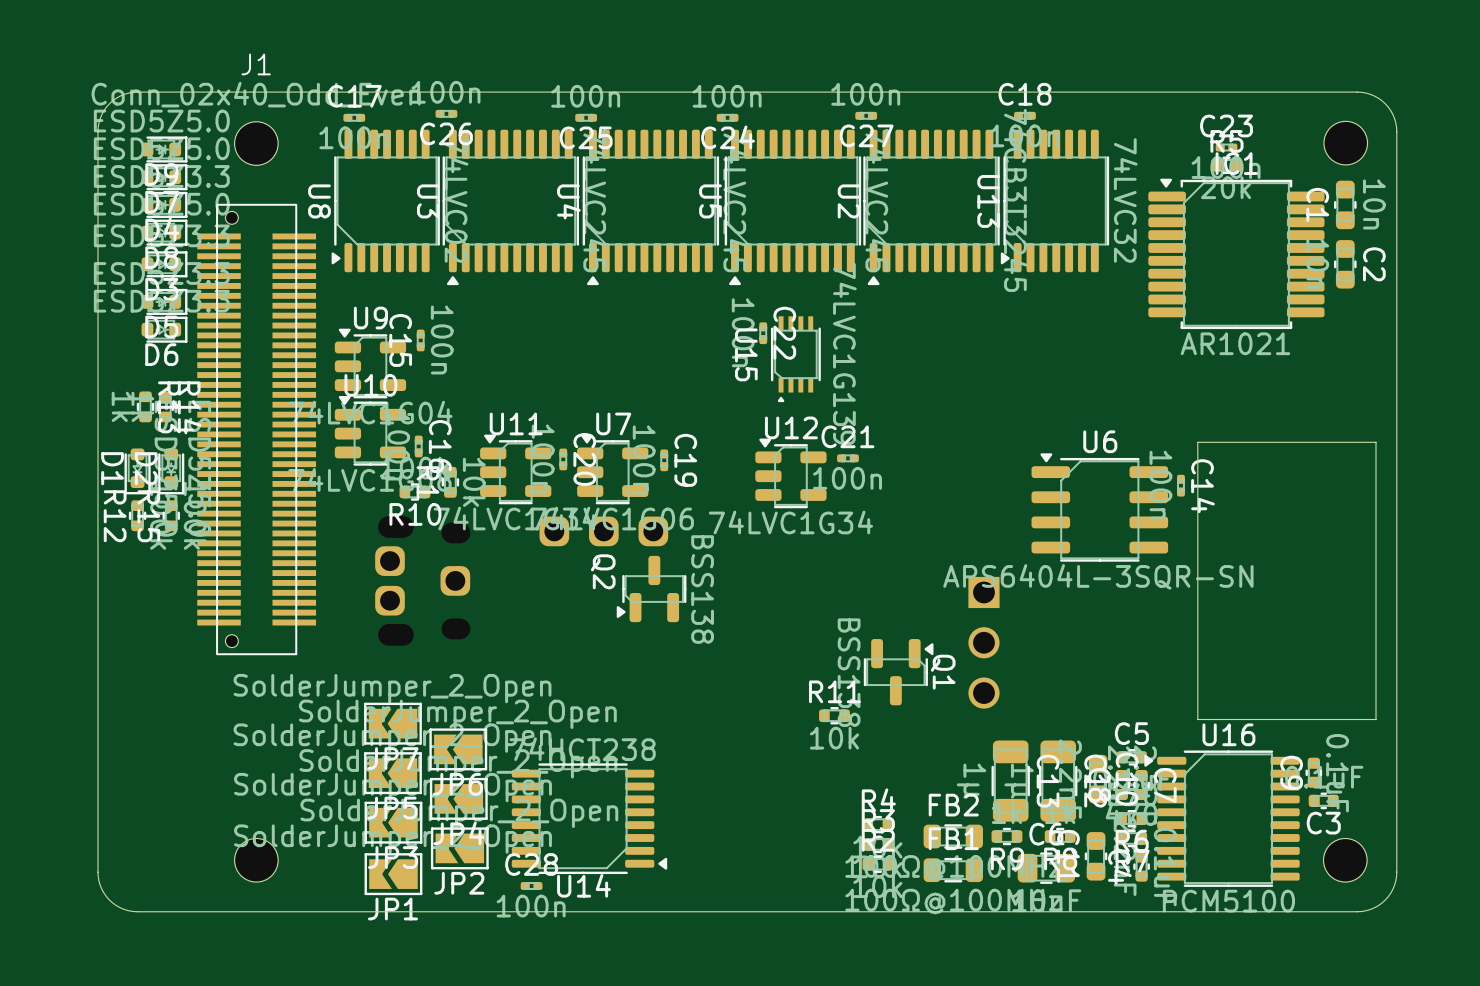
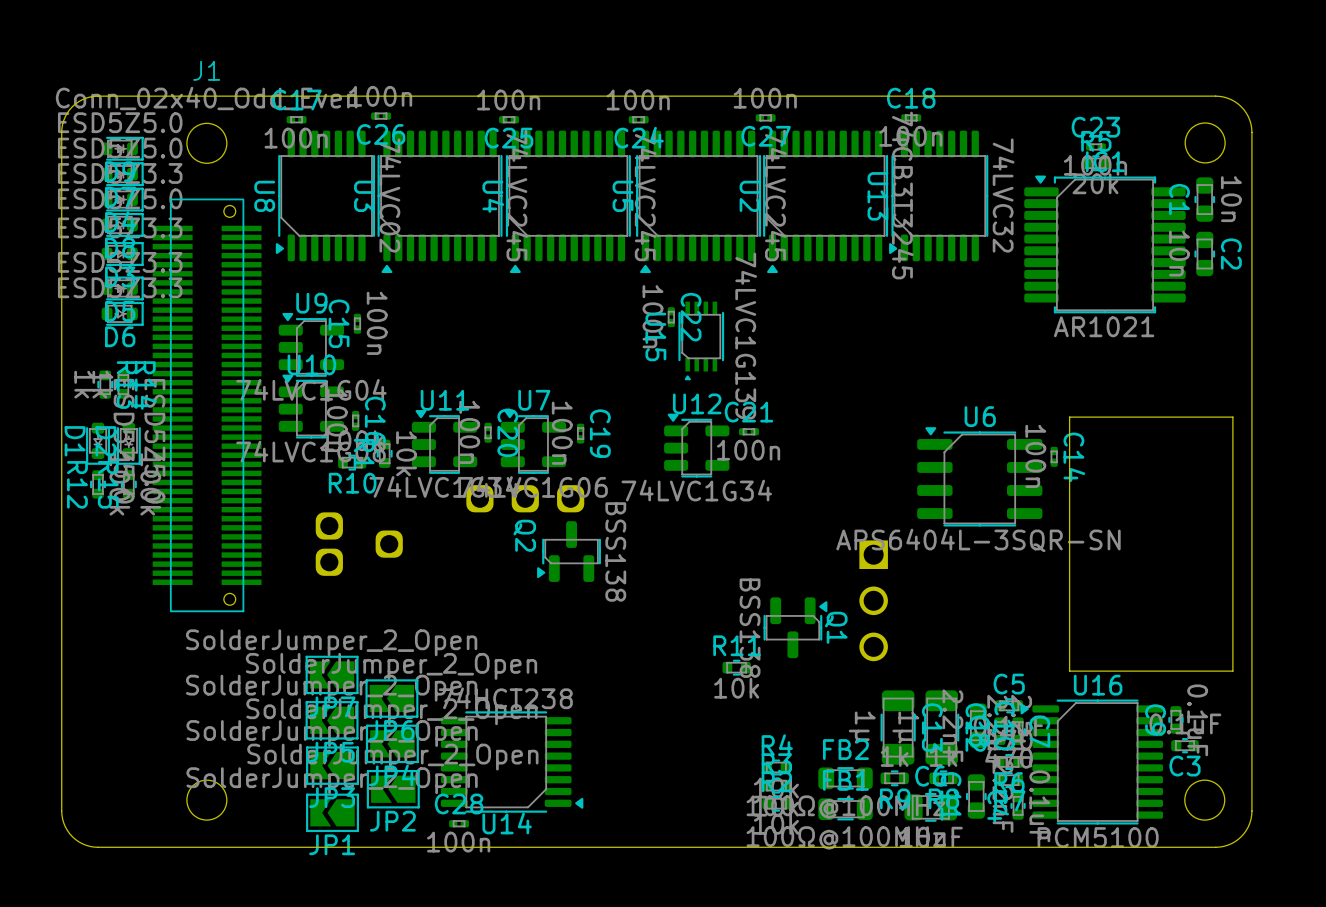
J1 rotation: 0° (256, 429) -> 180° (207, 405)

